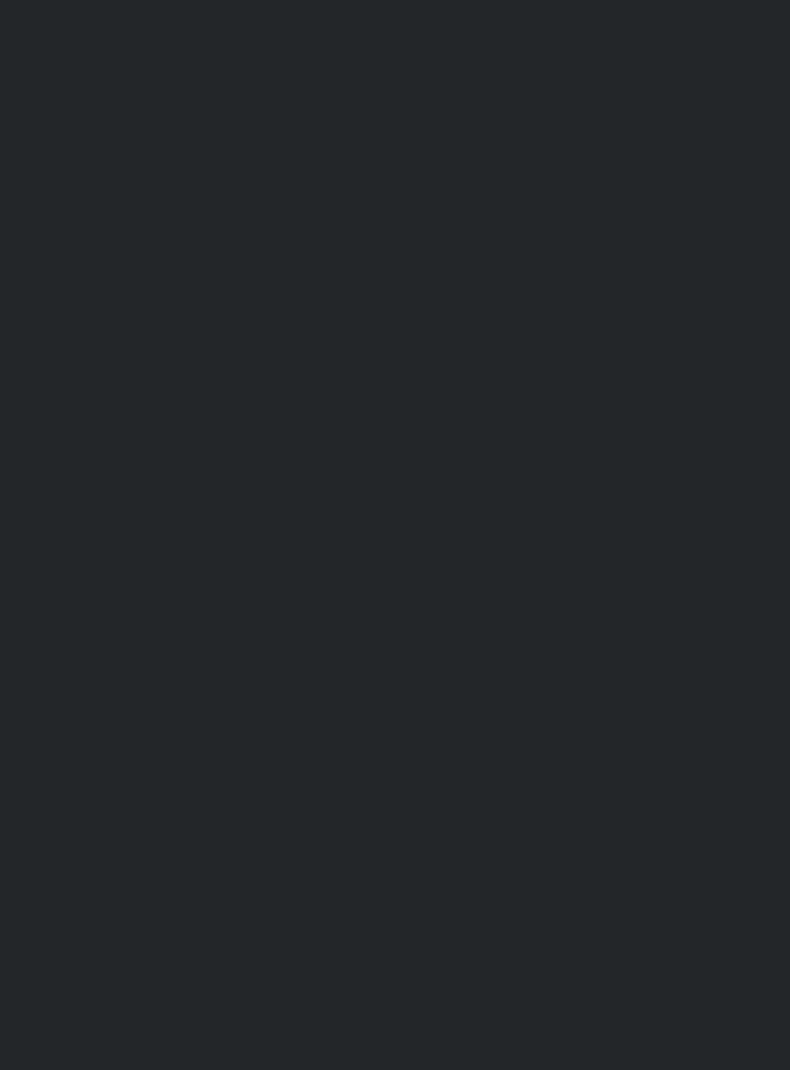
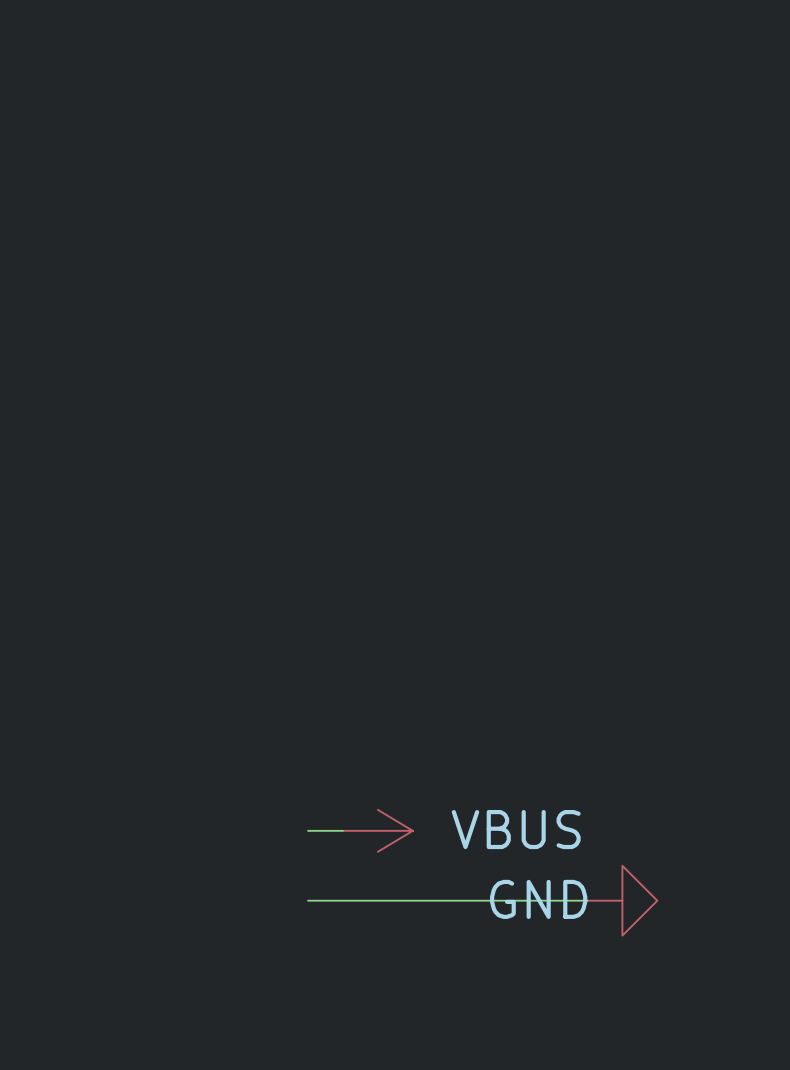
wire: none -> (308, 830) (342, 830)
power symbol: none -> VBUS (377, 830)
wire: none -> (308, 900) (587, 900)
power symbol: none -> GND (622, 900)

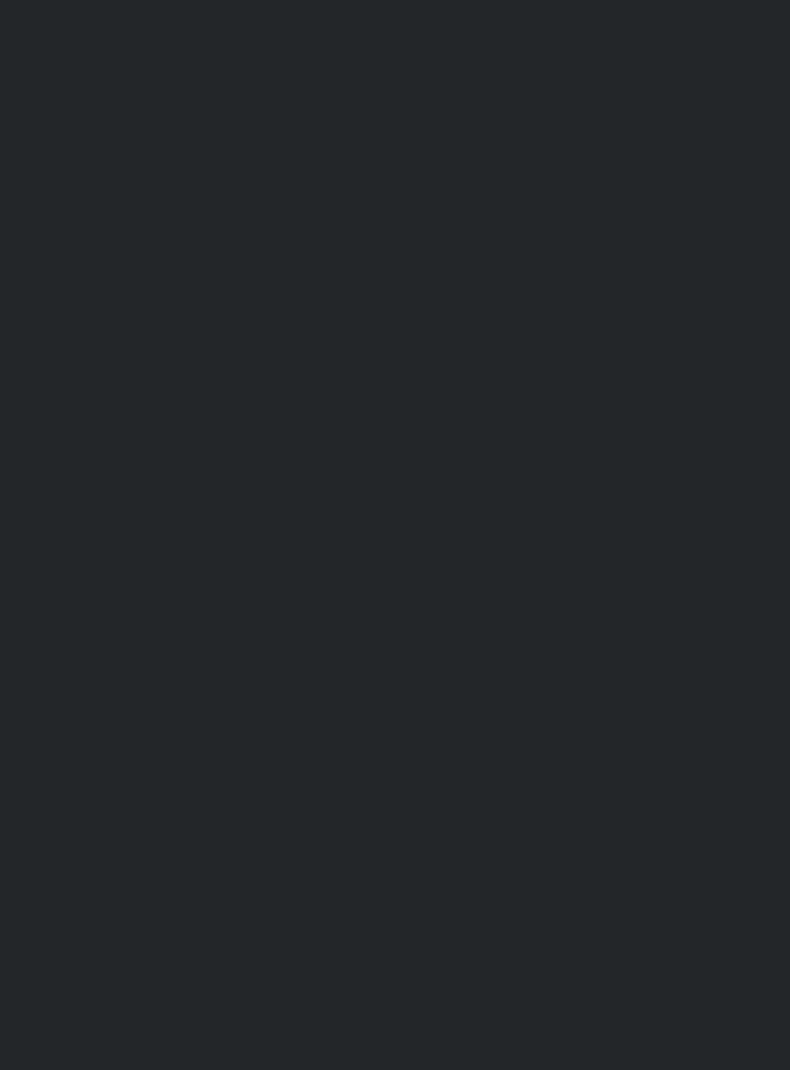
wire: (308, 830) (342, 830) -> none
power symbol: VBUS (377, 830) -> none
wire: (308, 900) (587, 900) -> none
power symbol: GND (622, 900) -> none

